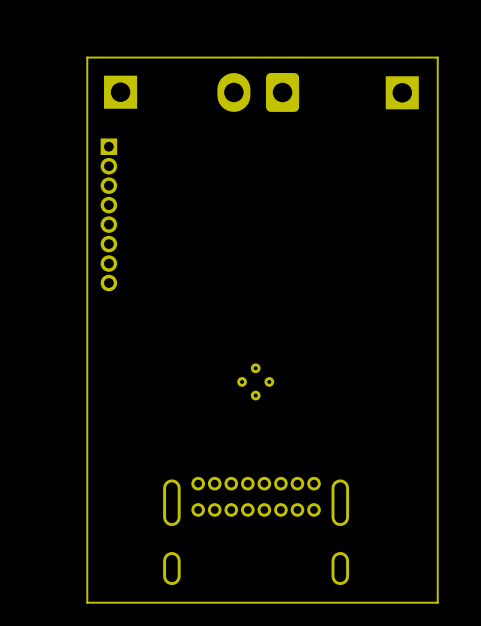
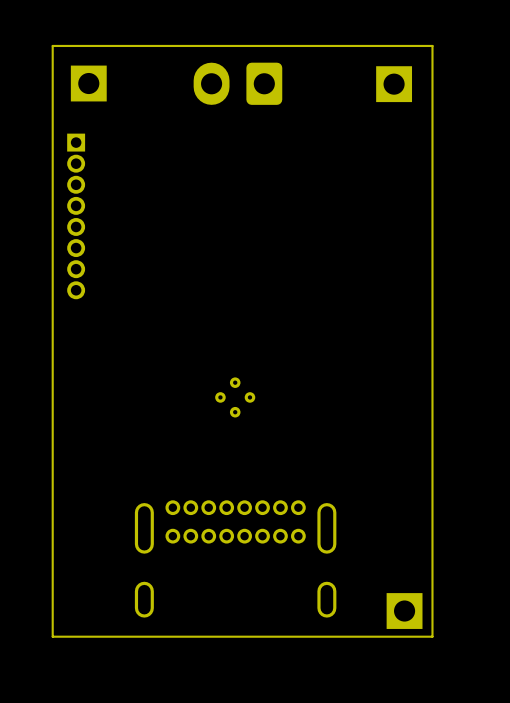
part: none -> (404, 611)

